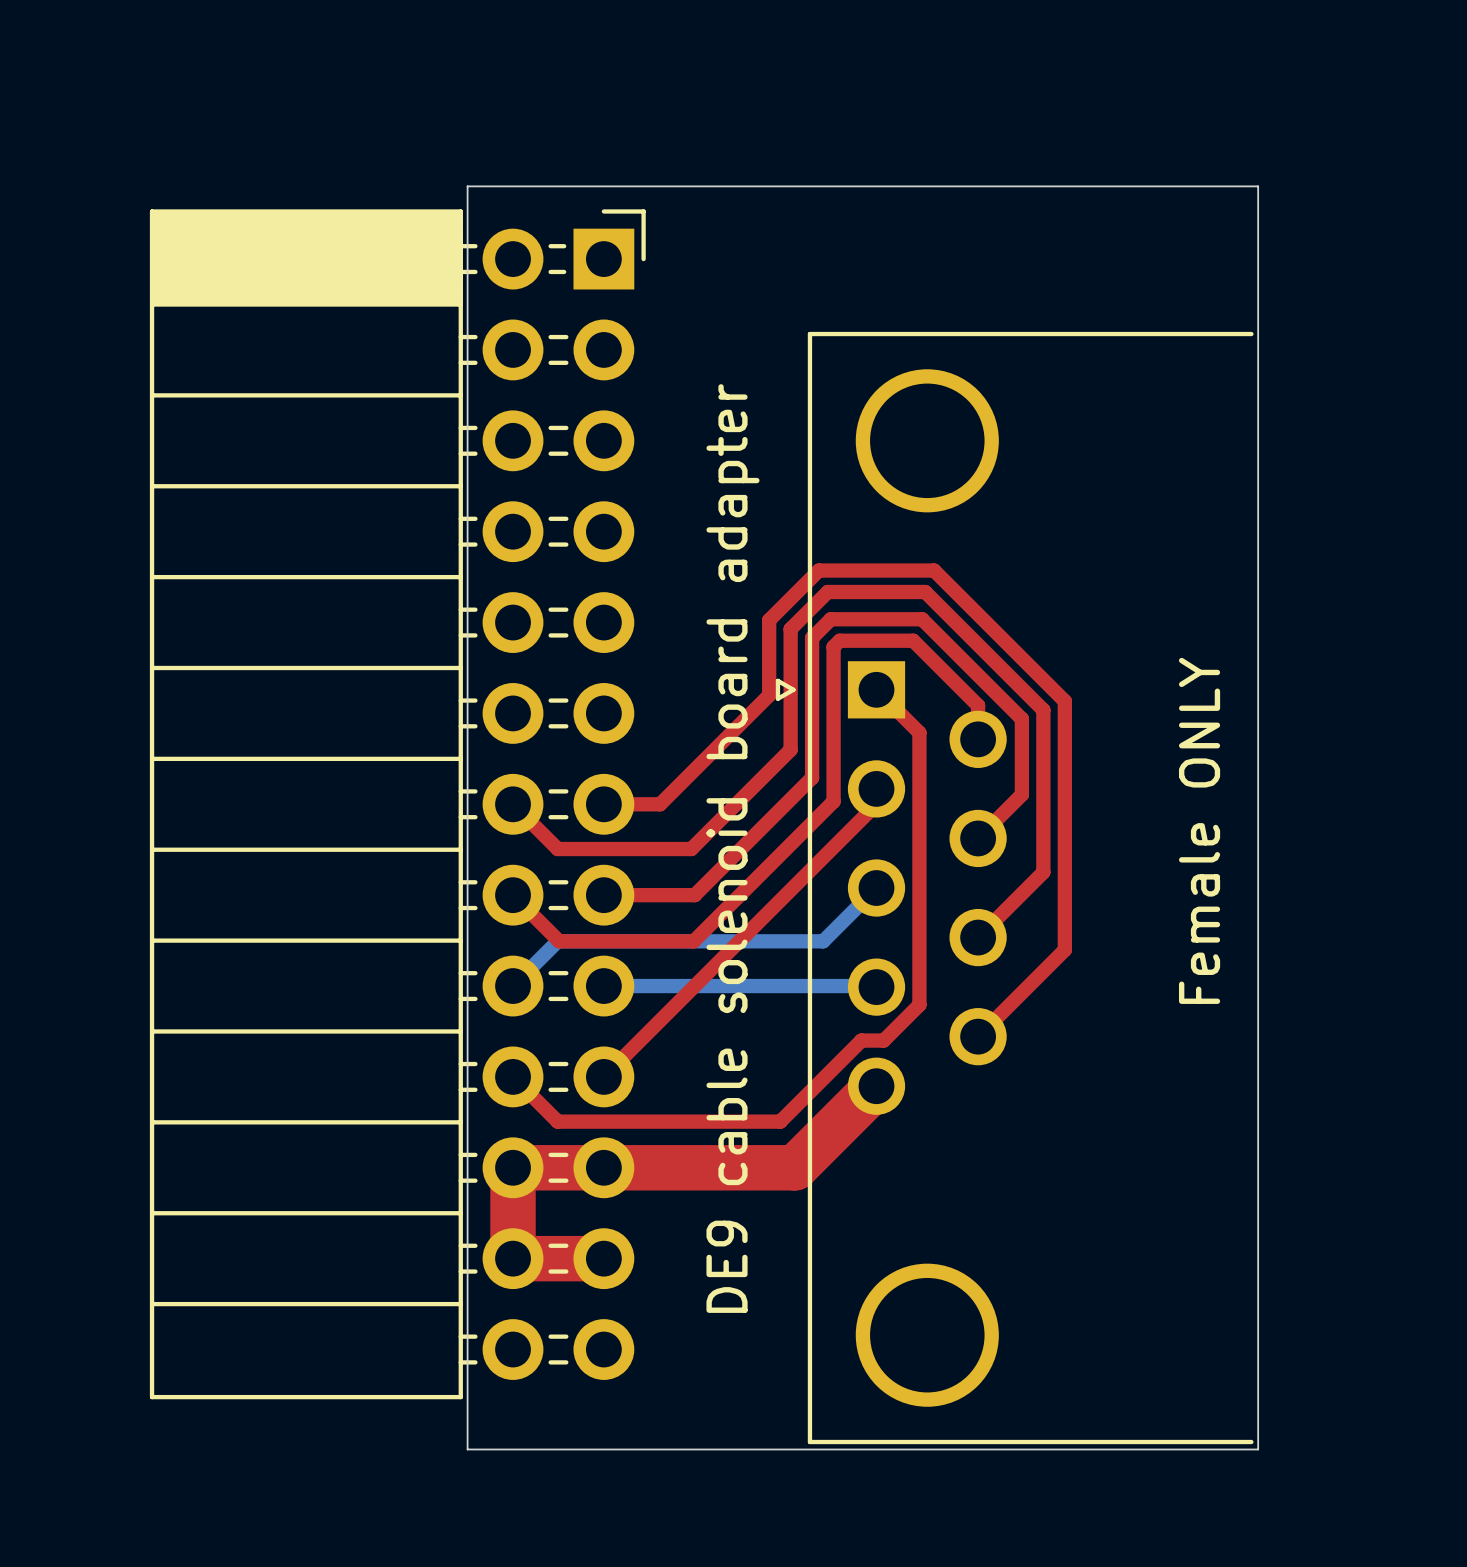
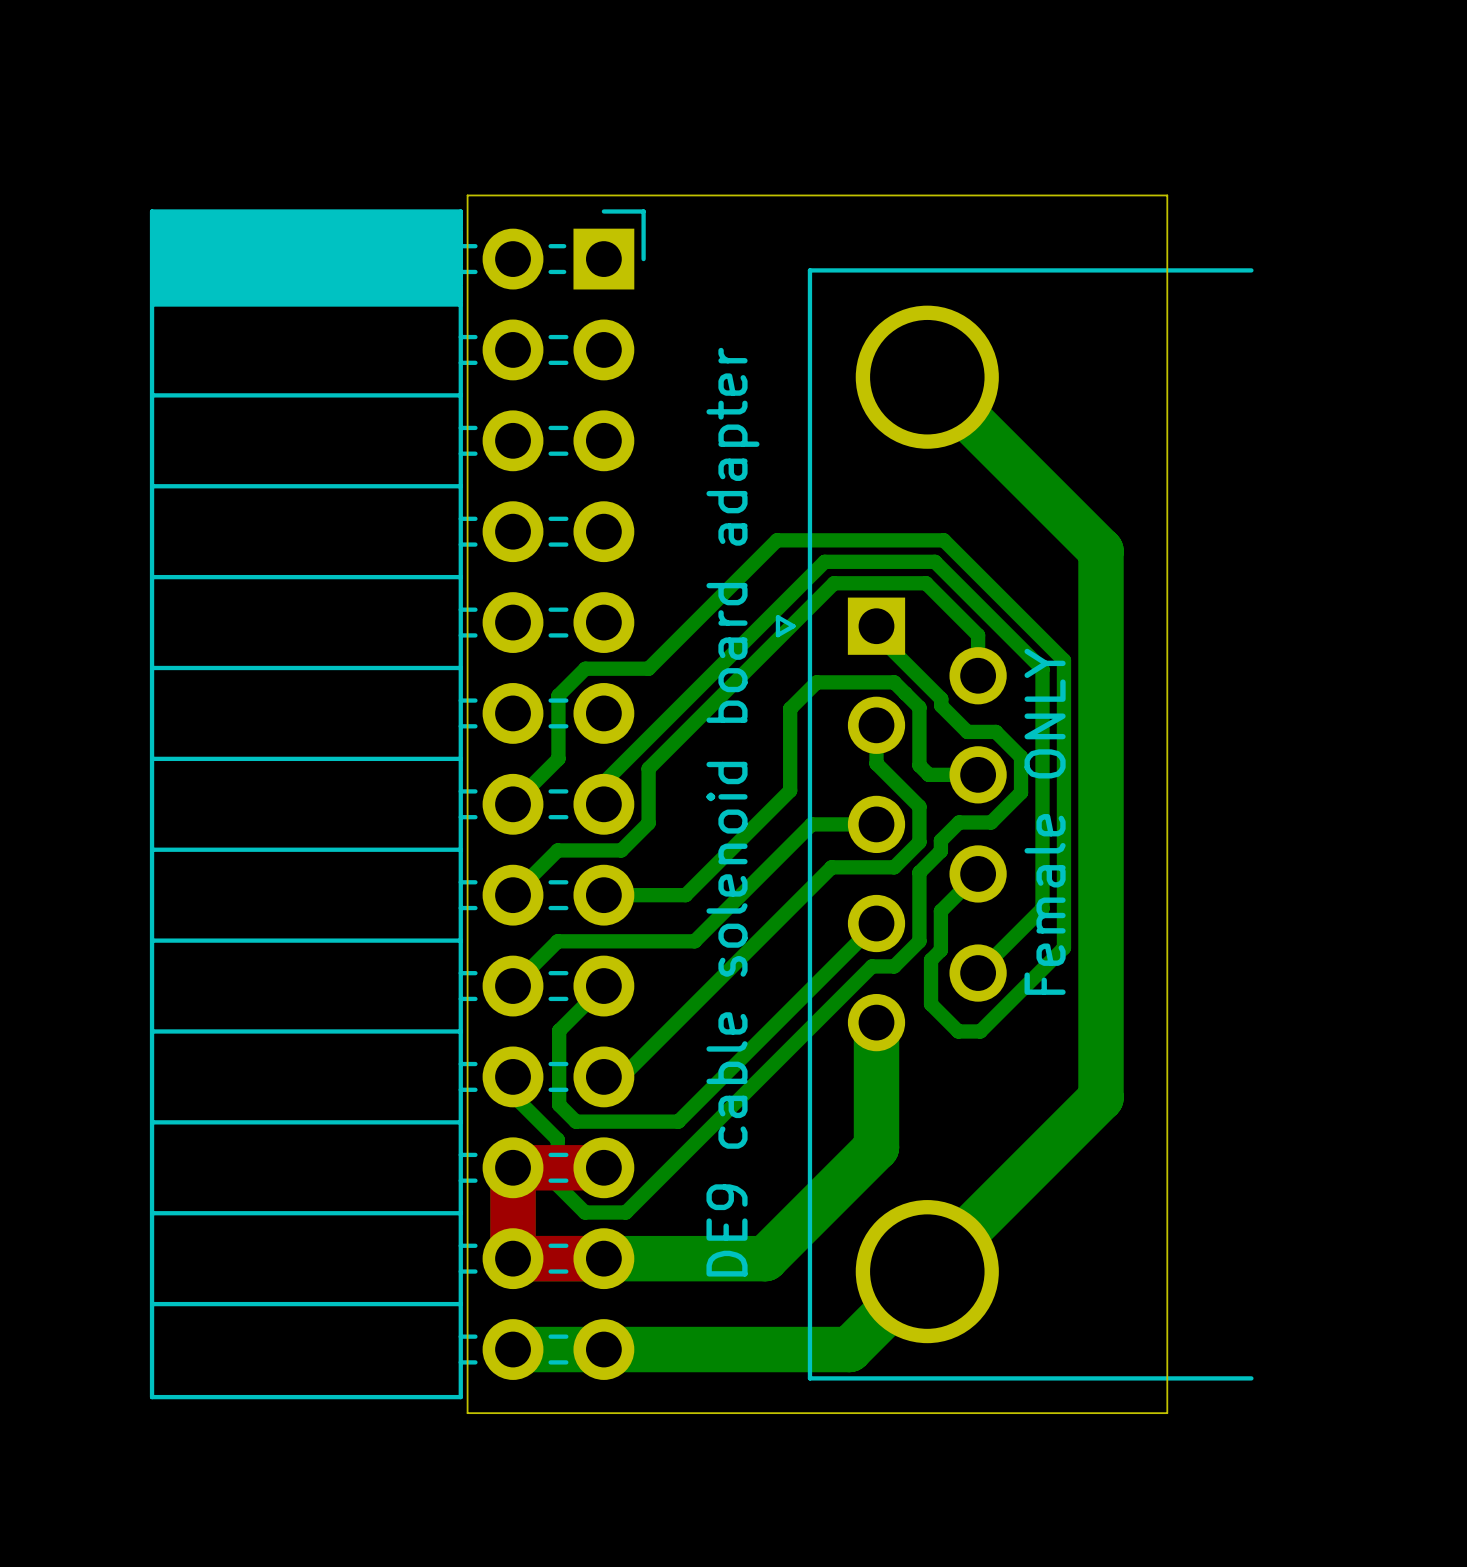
board edge: (467, 195) (467, 186) (1258, 186) (1258, 1449) (467, 1449) (467, 1413) -> (467, 195) (1167, 195) (1167, 1413) (467, 1413)
bottom track: none -> (927, 377) (1101, 550) (1101, 1097) (849, 1349) (513, 1349)
bottom track: none -> (876, 626) (876, 634) (941, 699) (941, 705) (967, 731) (995, 731) (1021, 757) (1021, 792) (991, 822) (959, 822) (940, 840) (940, 851) (919, 872) (919, 941) (894, 966) (871, 966) (625, 1212) (585, 1212) (557, 1185) (557, 1139) (513, 1095) (513, 1076)
bottom track: none -> (978, 675) (978, 635) (926, 583) (834, 583) (648, 768) (648, 823) (621, 850) (557, 850) (513, 895)
top track: (876, 689) (919, 732) (919, 1004) (883, 1040) (861, 1040) (780, 1121) (557, 1121) (513, 1076) -> none
bottom track: none -> (876, 725) (876, 763) (919, 806) (919, 842) (894, 867) (831, 867) (622, 1076) (603, 1076)
top track: (978, 739) (978, 705) (913, 640) (839, 640) (833, 646) (833, 801) (693, 941) (559, 941) (513, 895) -> none
bottom track: none -> (978, 774) (928, 774) (919, 765) (919, 707) (894, 682) (816, 682) (790, 708) (790, 790) (685, 895) (603, 895)
top track: (876, 788) (876, 804) (603, 1076) -> none
top track: (513, 804) (557, 849) (691, 849) (790, 749) (790, 629) (827, 592) (925, 592) (1043, 710) (1043, 872) (978, 937) -> none
bottom track: none -> (513, 804) (558, 758) (558, 695) (585, 668) (648, 668) (776, 540) (943, 540) (1063, 660) (1063, 947) (980, 1031) (958, 1031) (931, 1004) (931, 960) (940, 950) (940, 911) (978, 873)
top track: (603, 804) (660, 804) (769, 695) (769, 620) (818, 570) (934, 570) (1064, 701) (1064, 949) (978, 1036) -> none
bottom track: none -> (603, 804) (603, 782) (824, 561) (934, 561) (1042, 669) (1042, 908) (978, 973)
text position: Female ONLY (1199, 830) -> Female ONLY (1045, 821)
top track: (978, 838) (1021, 794) (1021, 718) (922, 619) (830, 619) (812, 637) (812, 777) (694, 895) (603, 895) -> none
text position: DE9 cable solenoid board adapter (732, 848) -> DE9 cable solenoid board adapter (732, 812)
bottom track: (876, 888) (823, 941) (694, 941) -> (876, 824) (811, 824) (694, 941)
part position: (1014, 888) -> (1014, 824)
bottom track: (603, 986) (876, 987) -> (603, 986) (559, 1030) (559, 1104) (575, 1121) (678, 1121) (876, 923) (875, 922)
bottom track: none -> (876, 1022) (876, 1147) (765, 1258) (513, 1258) (513, 1167)
top track: (876, 1086) (794, 1167) (603, 1167) -> none

